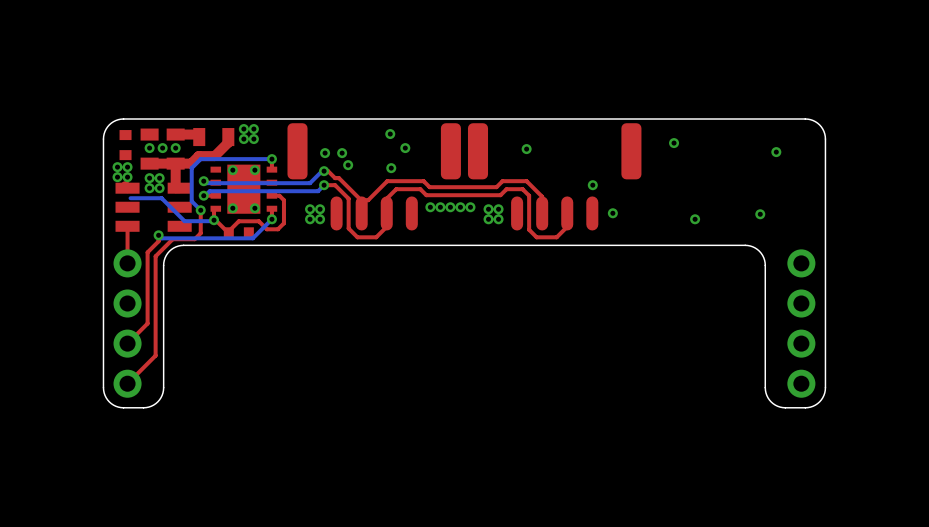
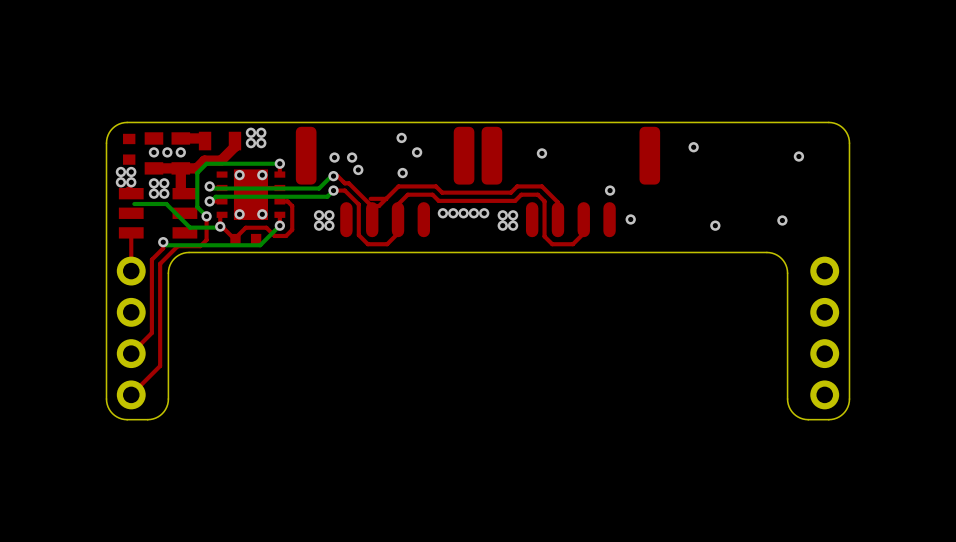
top track: none -> (386, 198) (370, 198)

